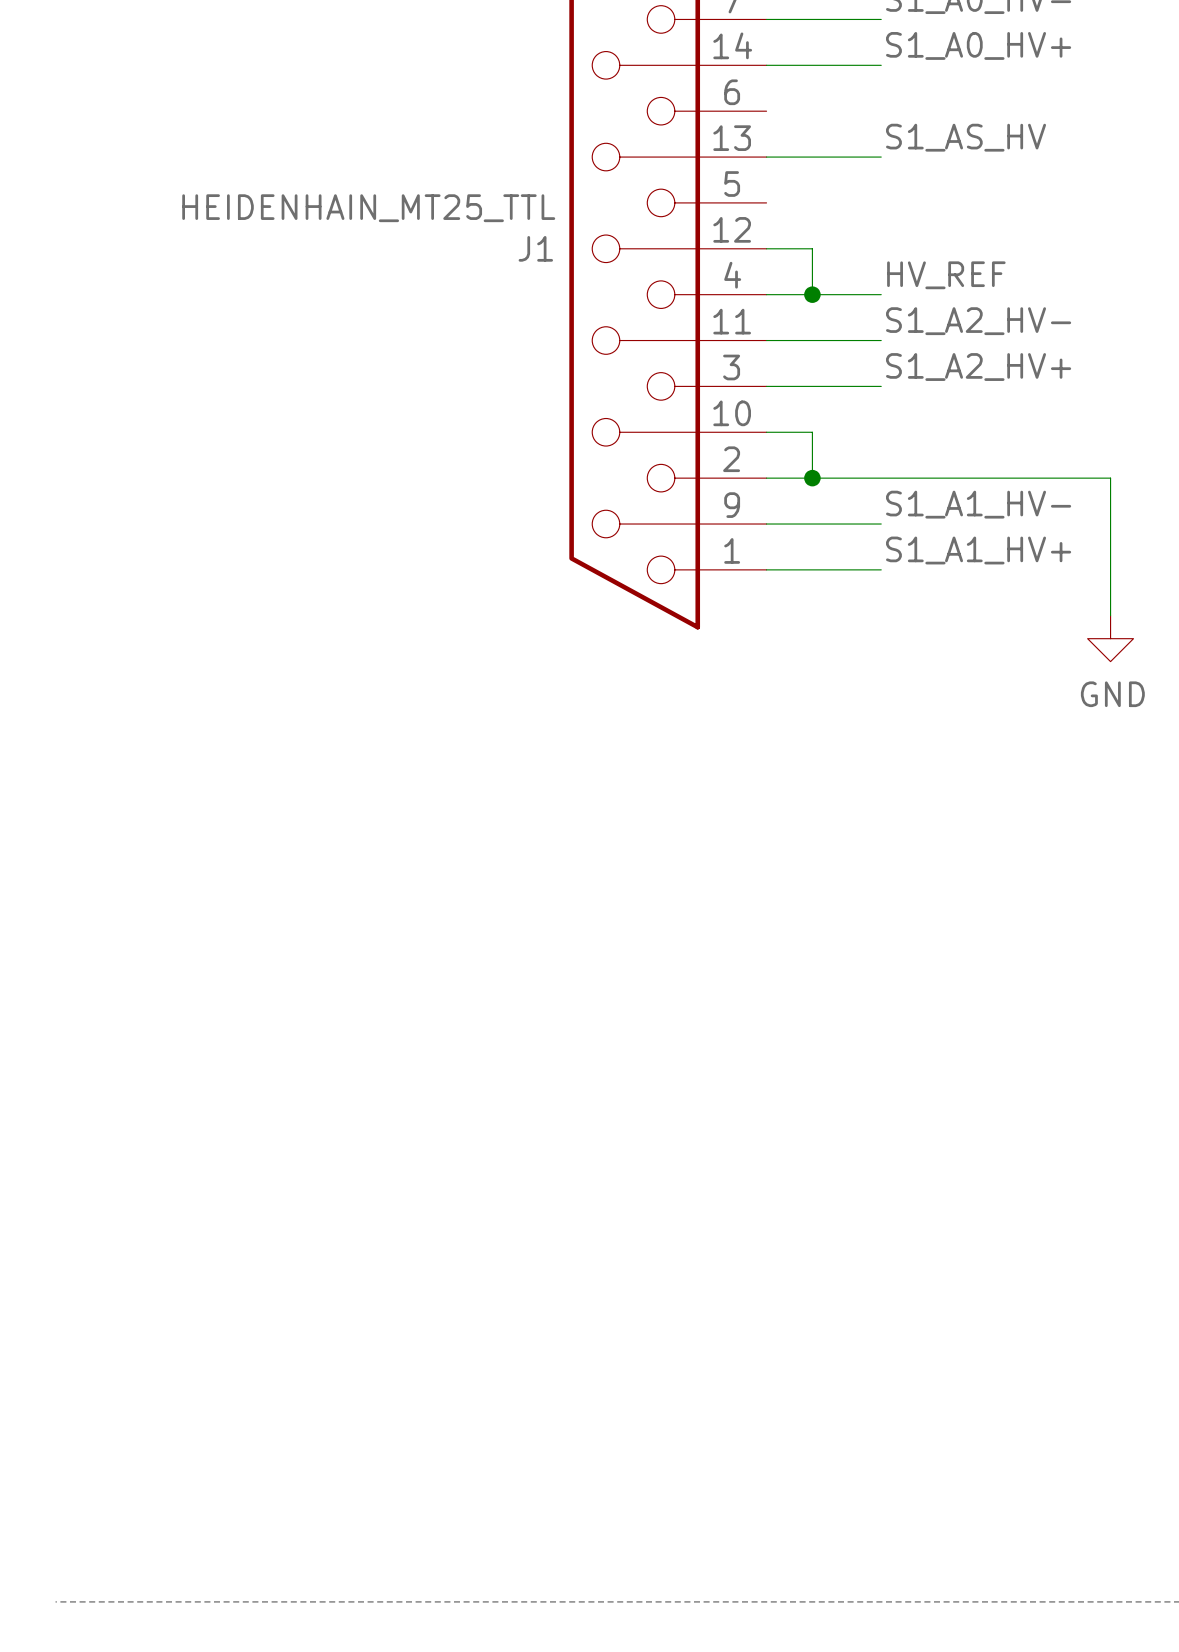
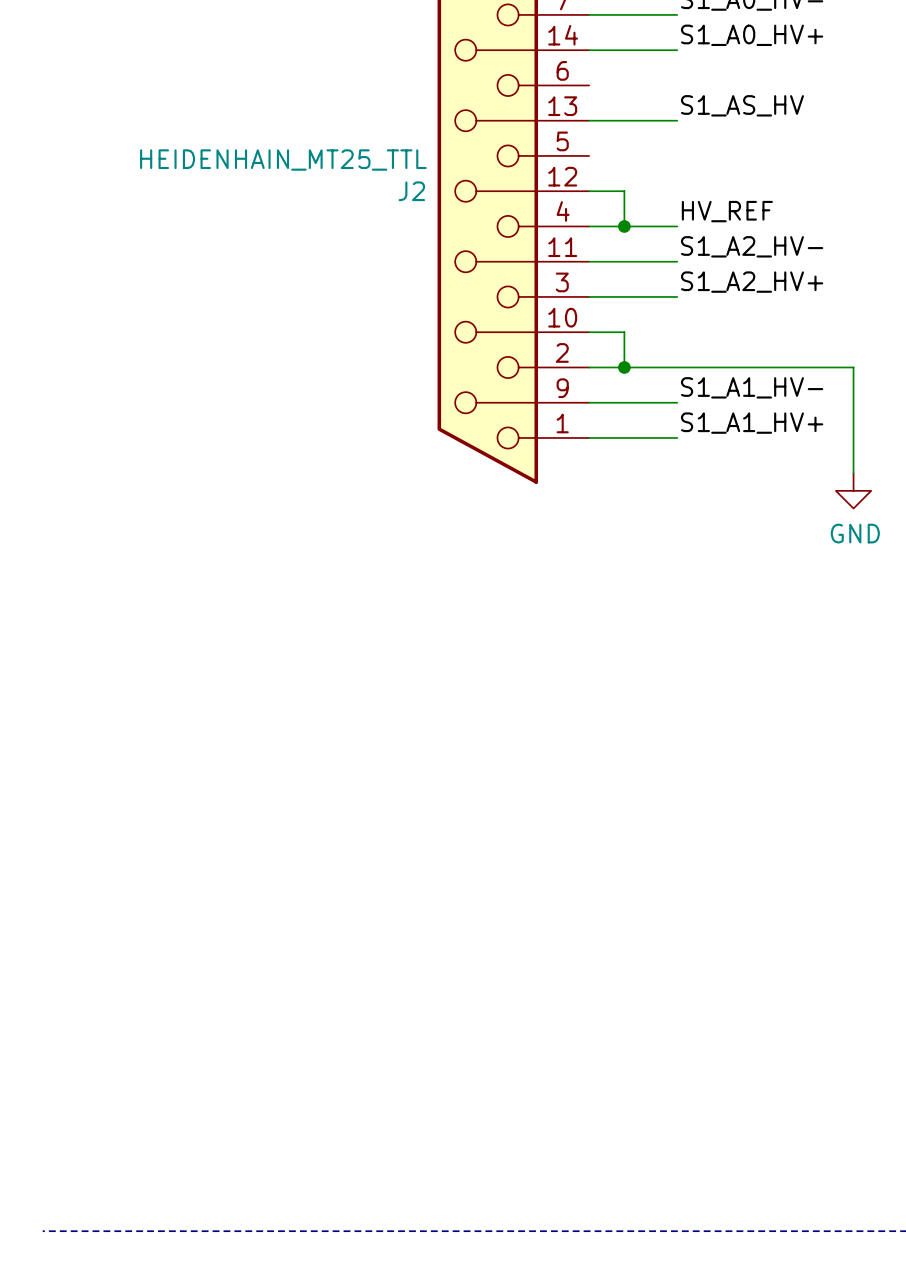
J1 name: J1 (535, 248) -> J2 (411, 191)

